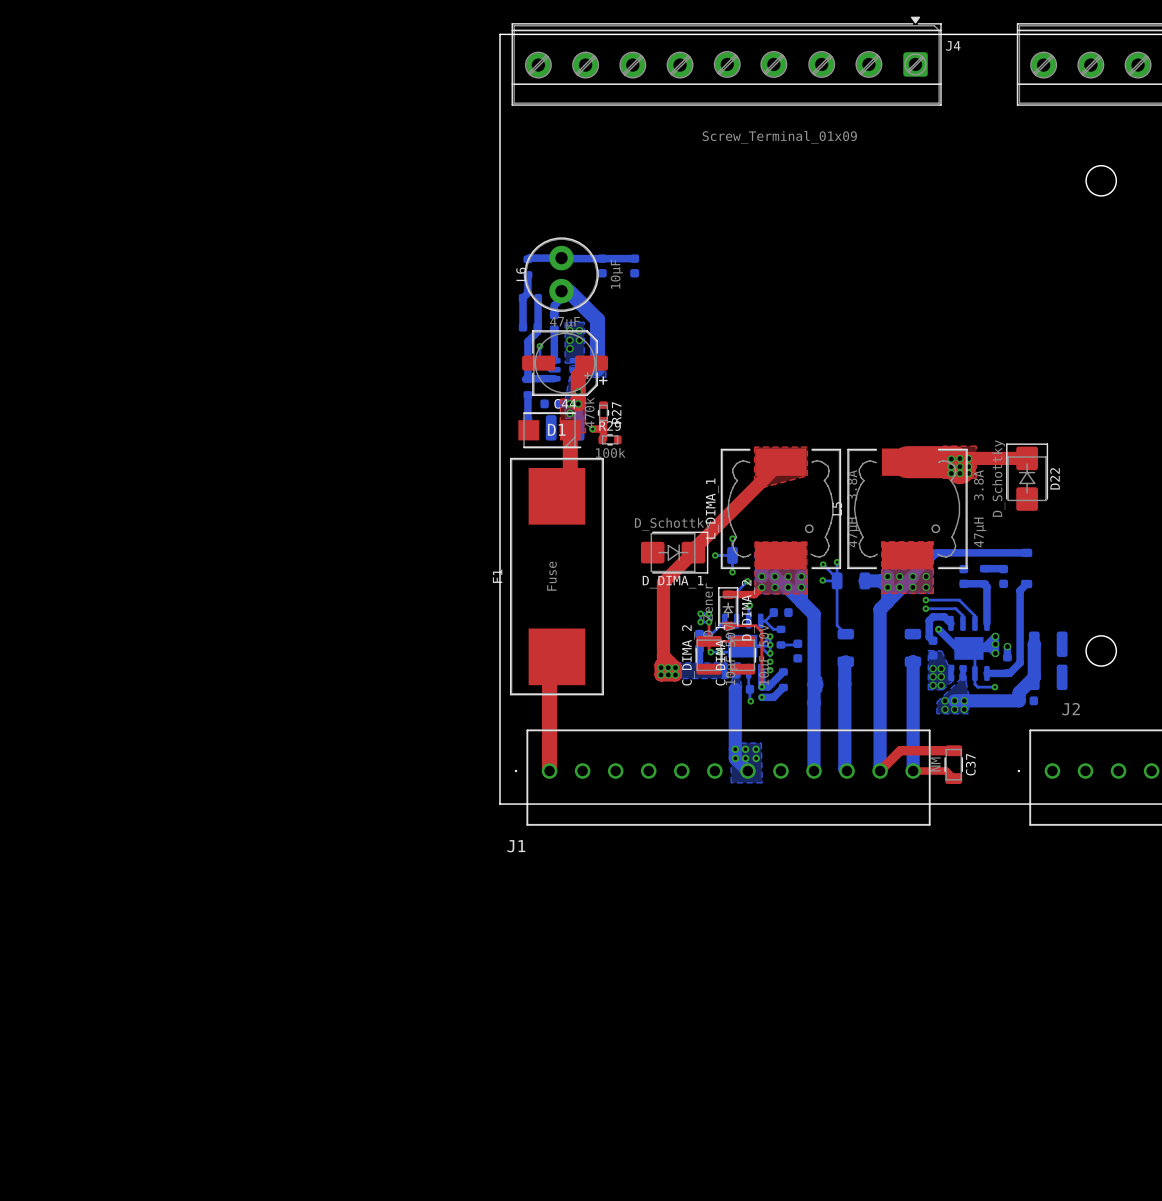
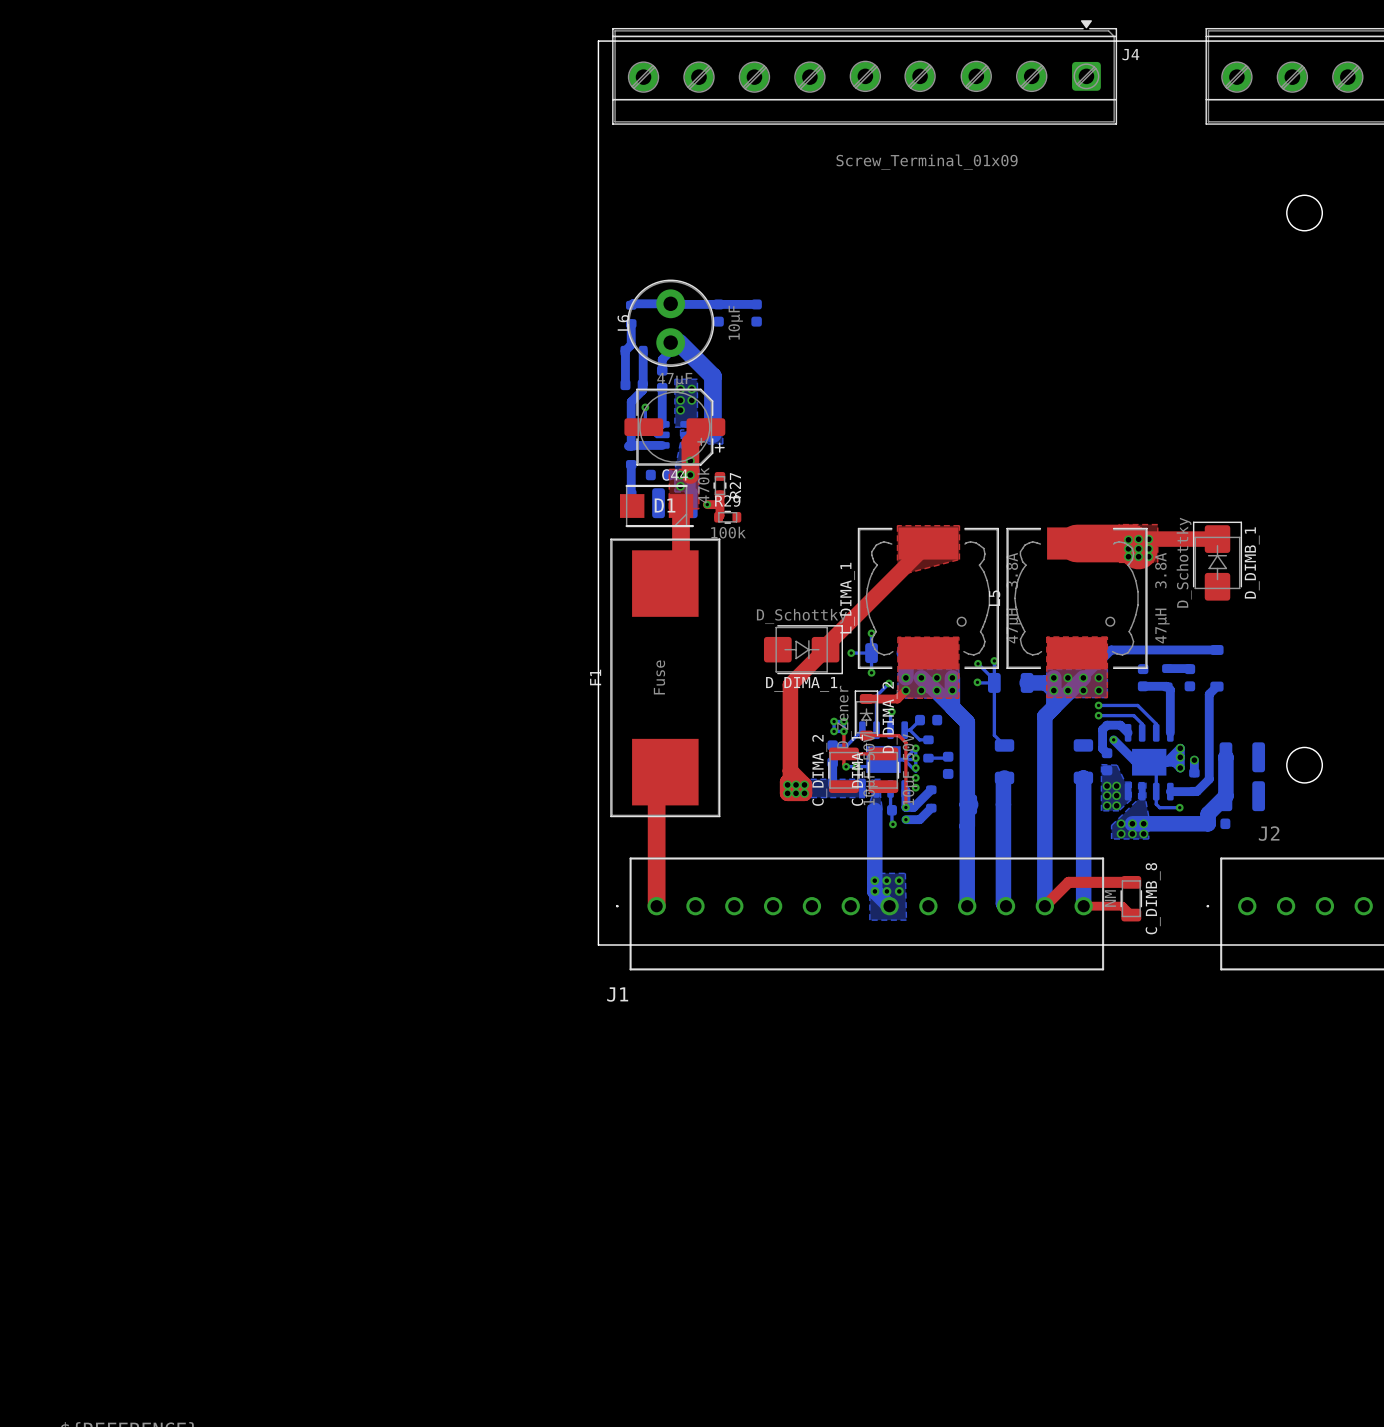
D22 name: D22 (1054, 478) -> D_DIMB_1 (1252, 562)
C37 name: C37 (970, 764) -> C_DIMB_8 (1153, 898)

